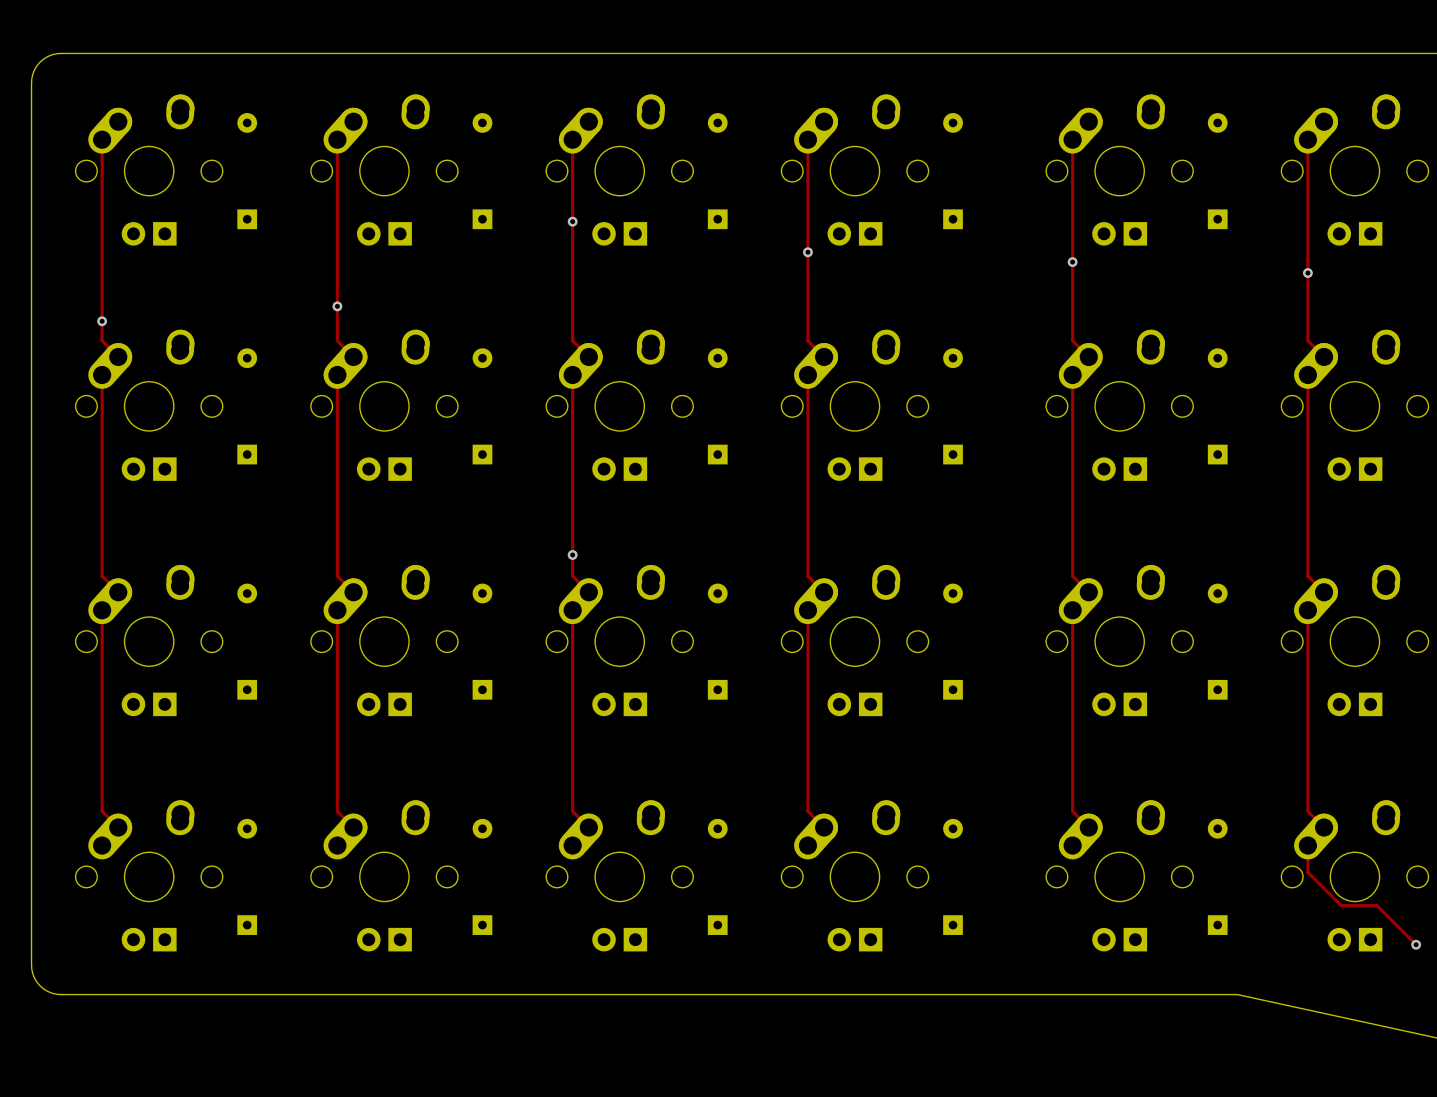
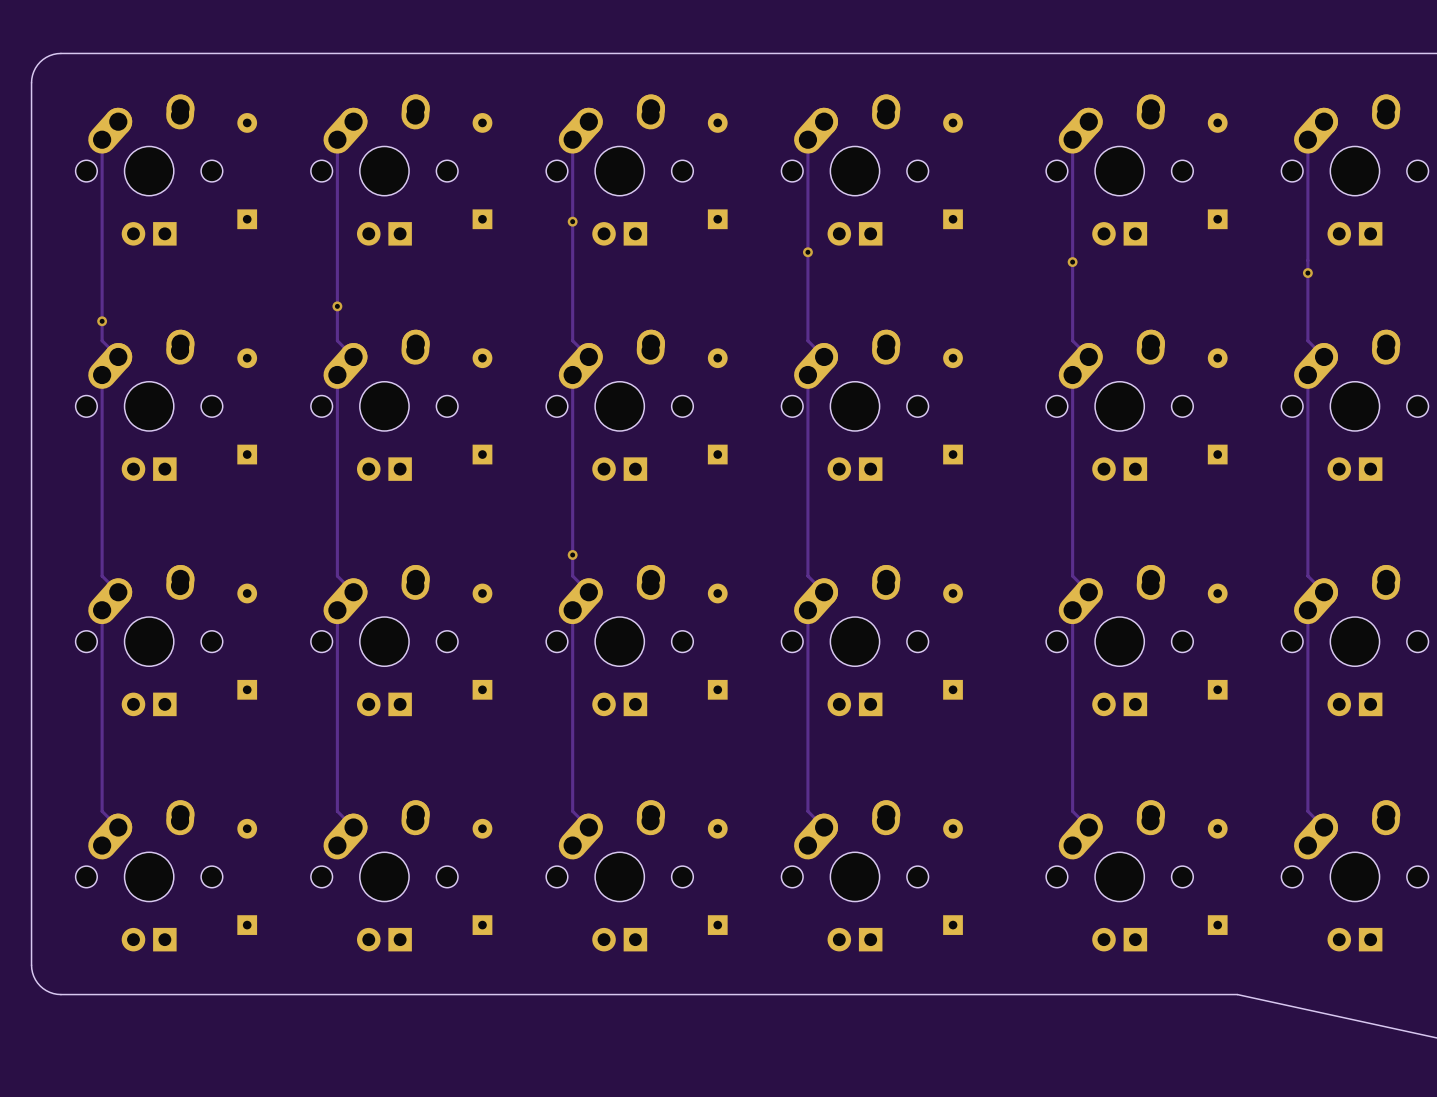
track: (1307, 845) (1307, 872) (1341, 905) (1376, 905) (1416, 944) -> none
via: (1416, 944) -> none

